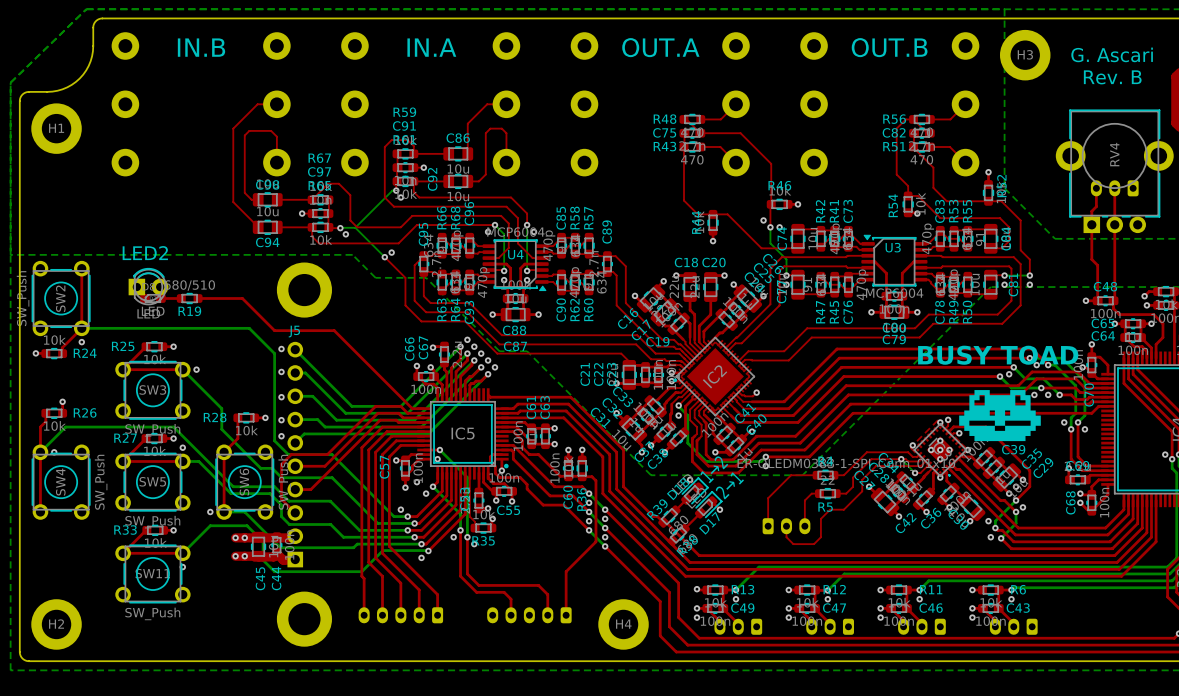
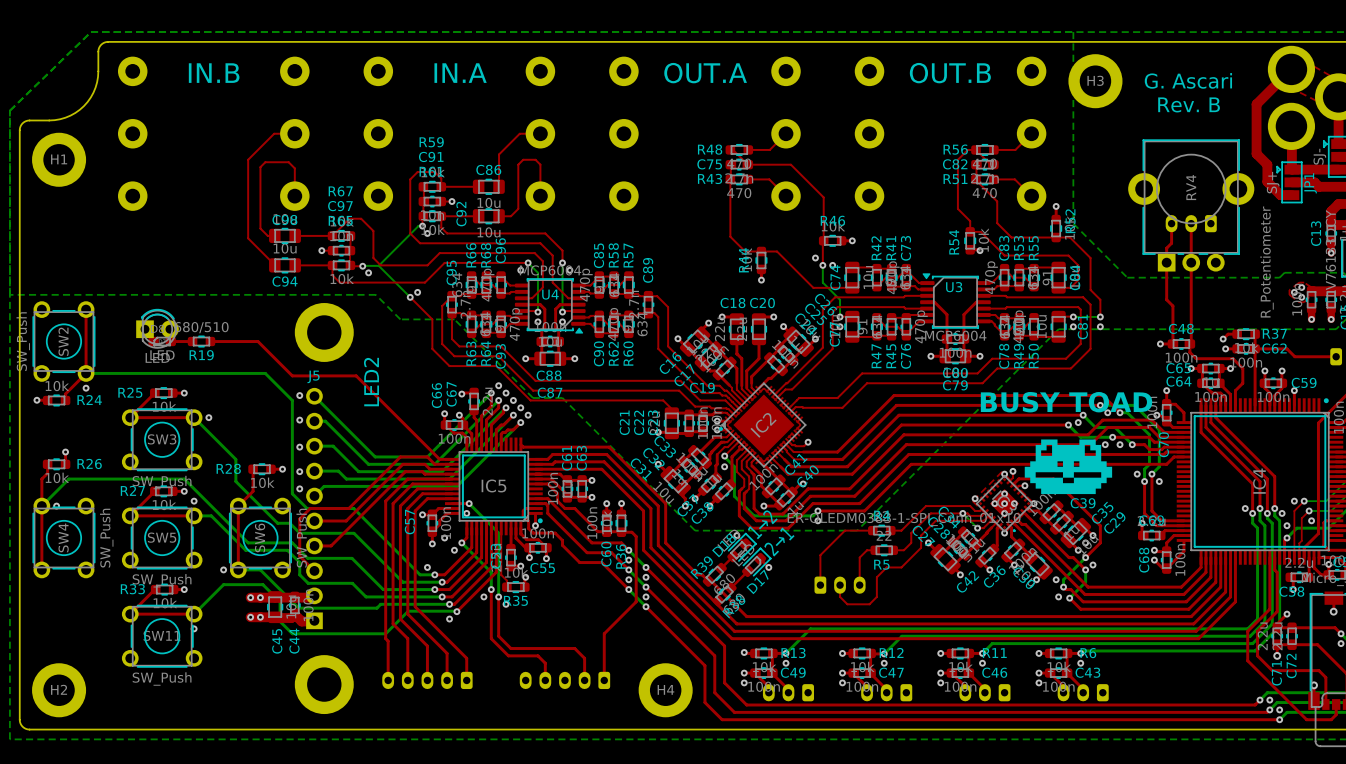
text: LED2 (145, 253) -> none
text: none -> LED2 (371, 382)

